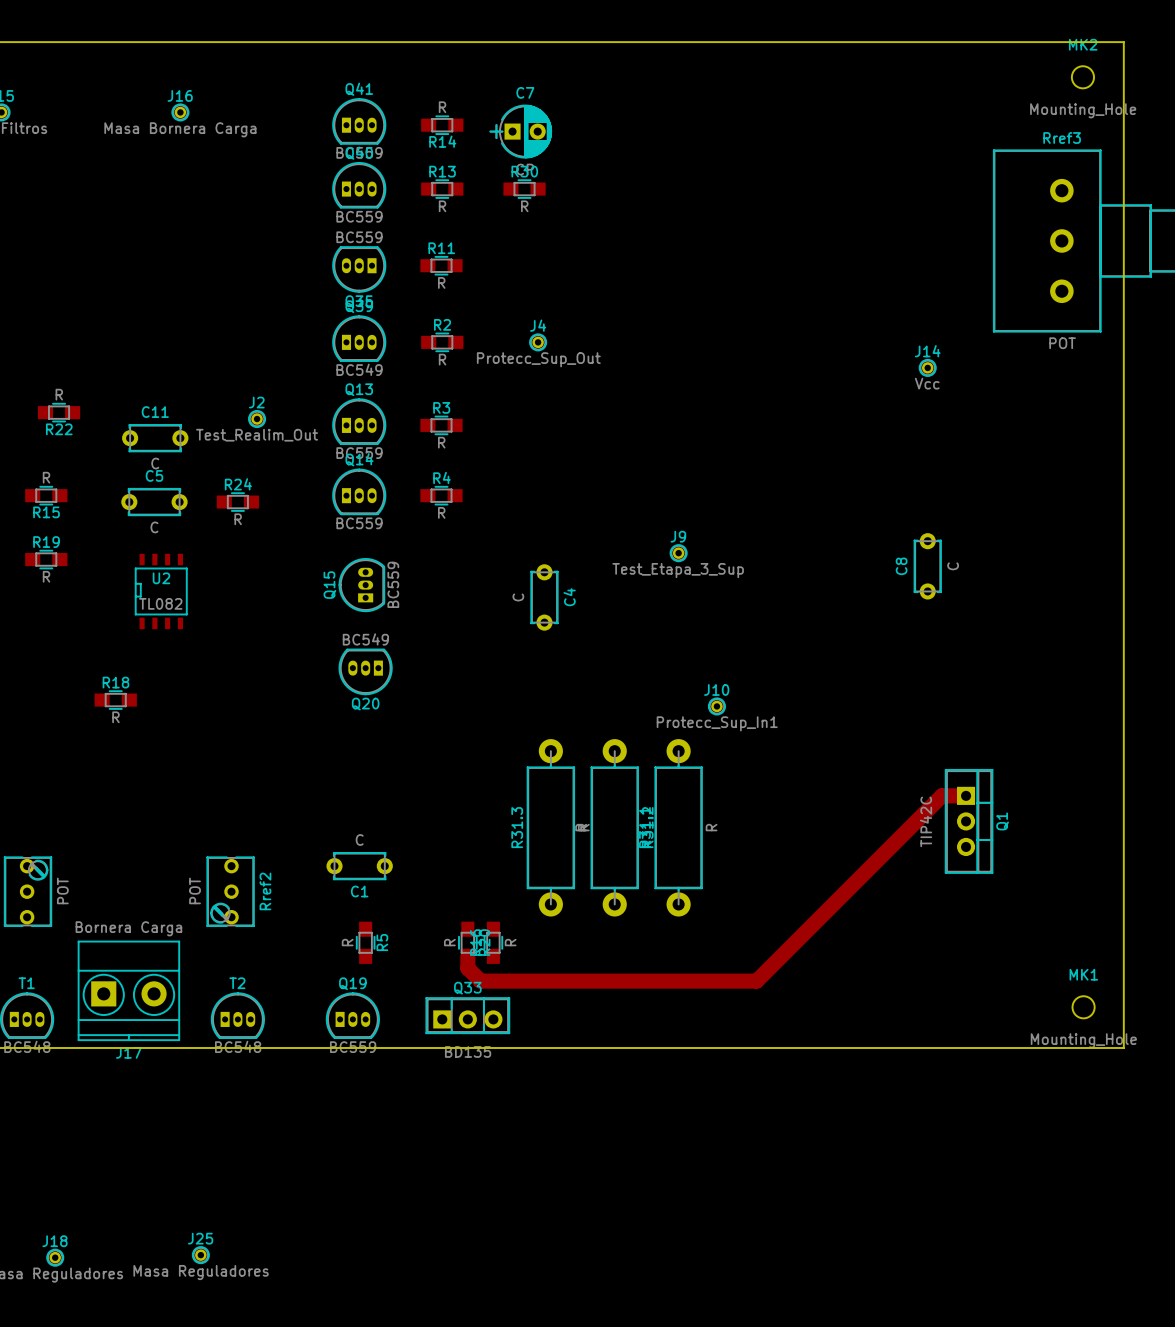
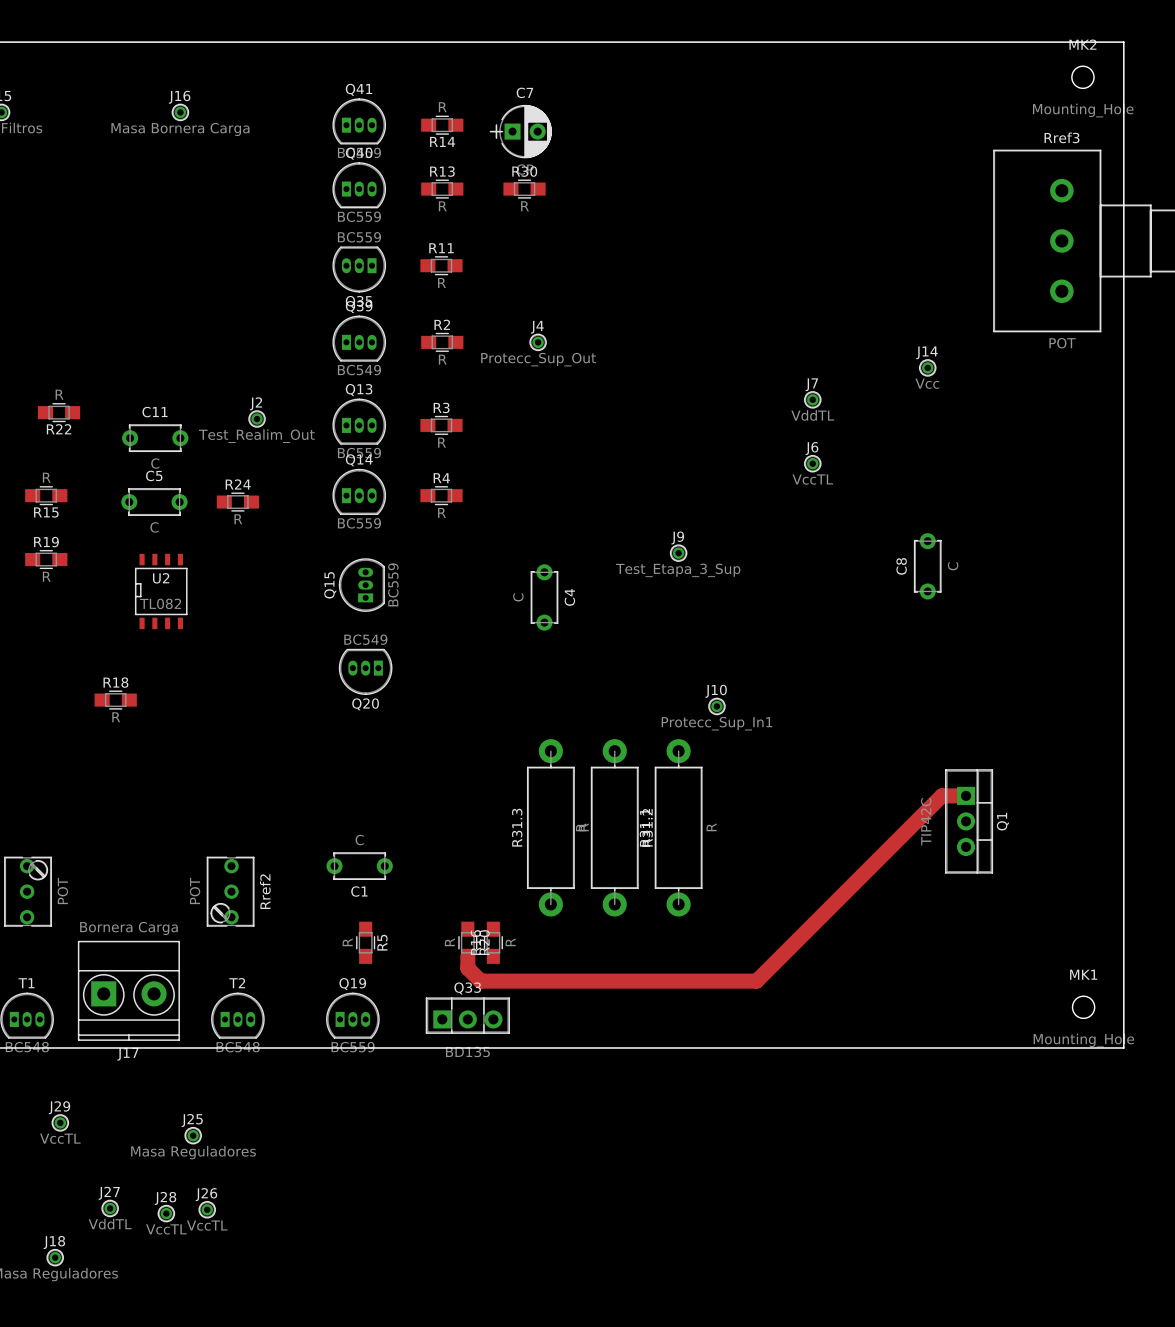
J7: none -> VddTL (812, 399)
J6: none -> VccTL (812, 463)
J29: none -> VccTL (60, 1122)
J27: none -> VddTL (110, 1208)
J26: none -> VccTL (207, 1209)
J28: none -> VccTL (166, 1213)
J25 position: (200, 1255) -> (193, 1135)

